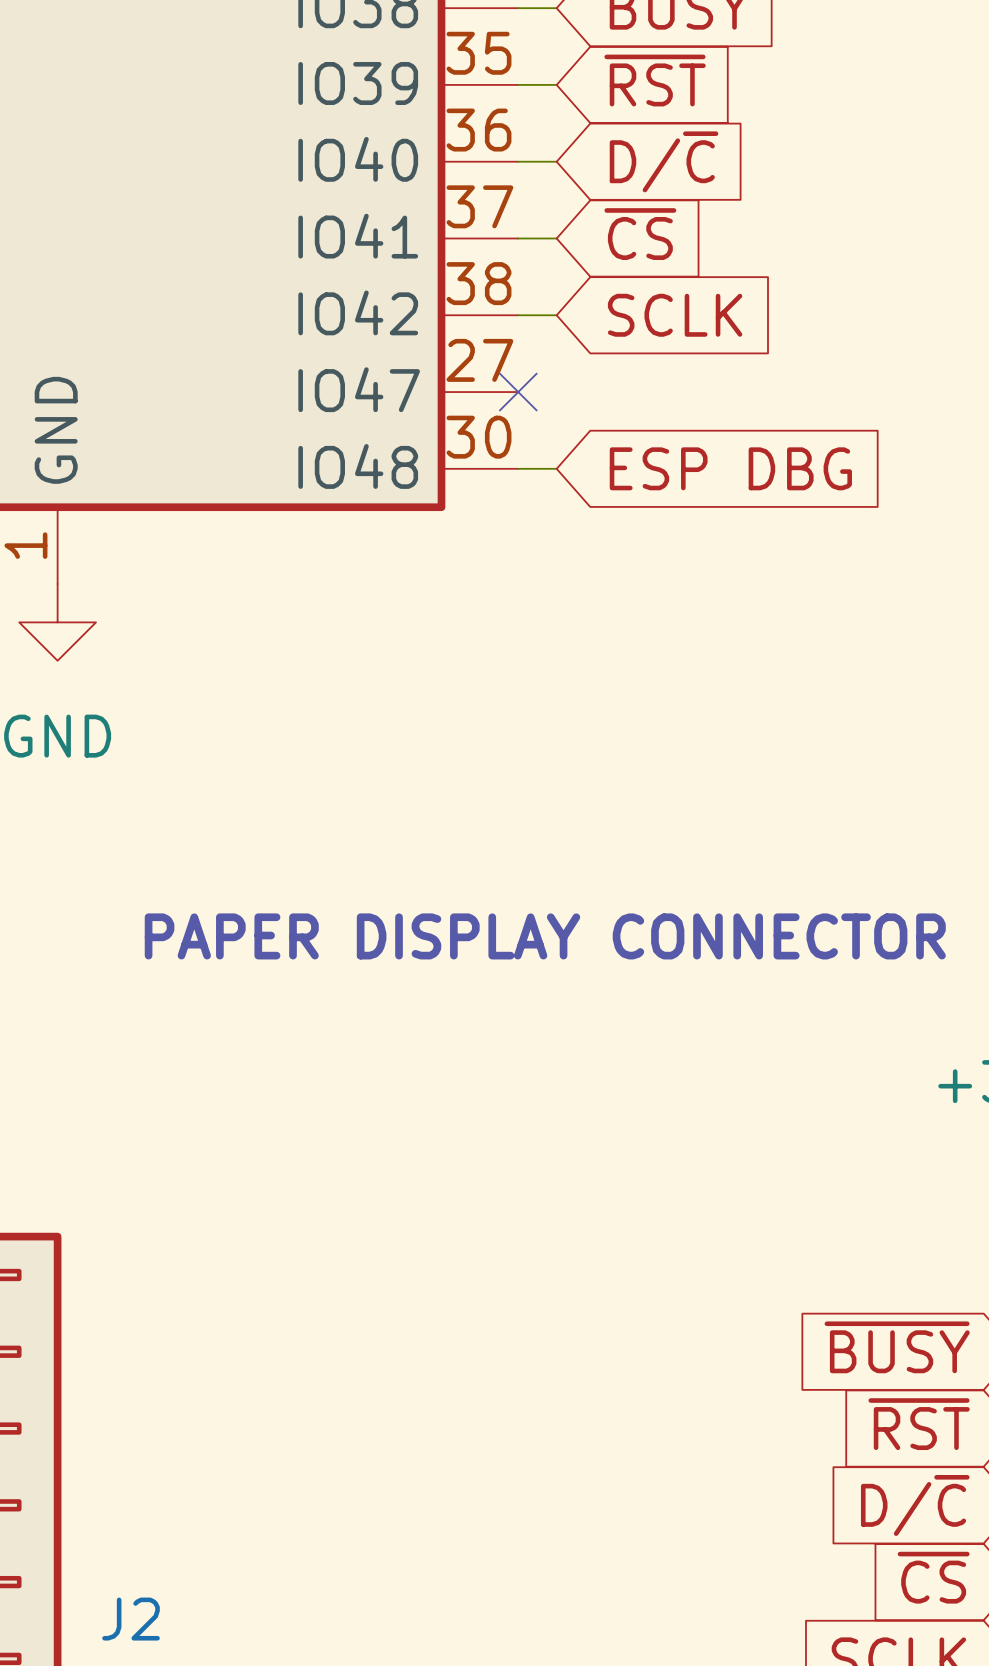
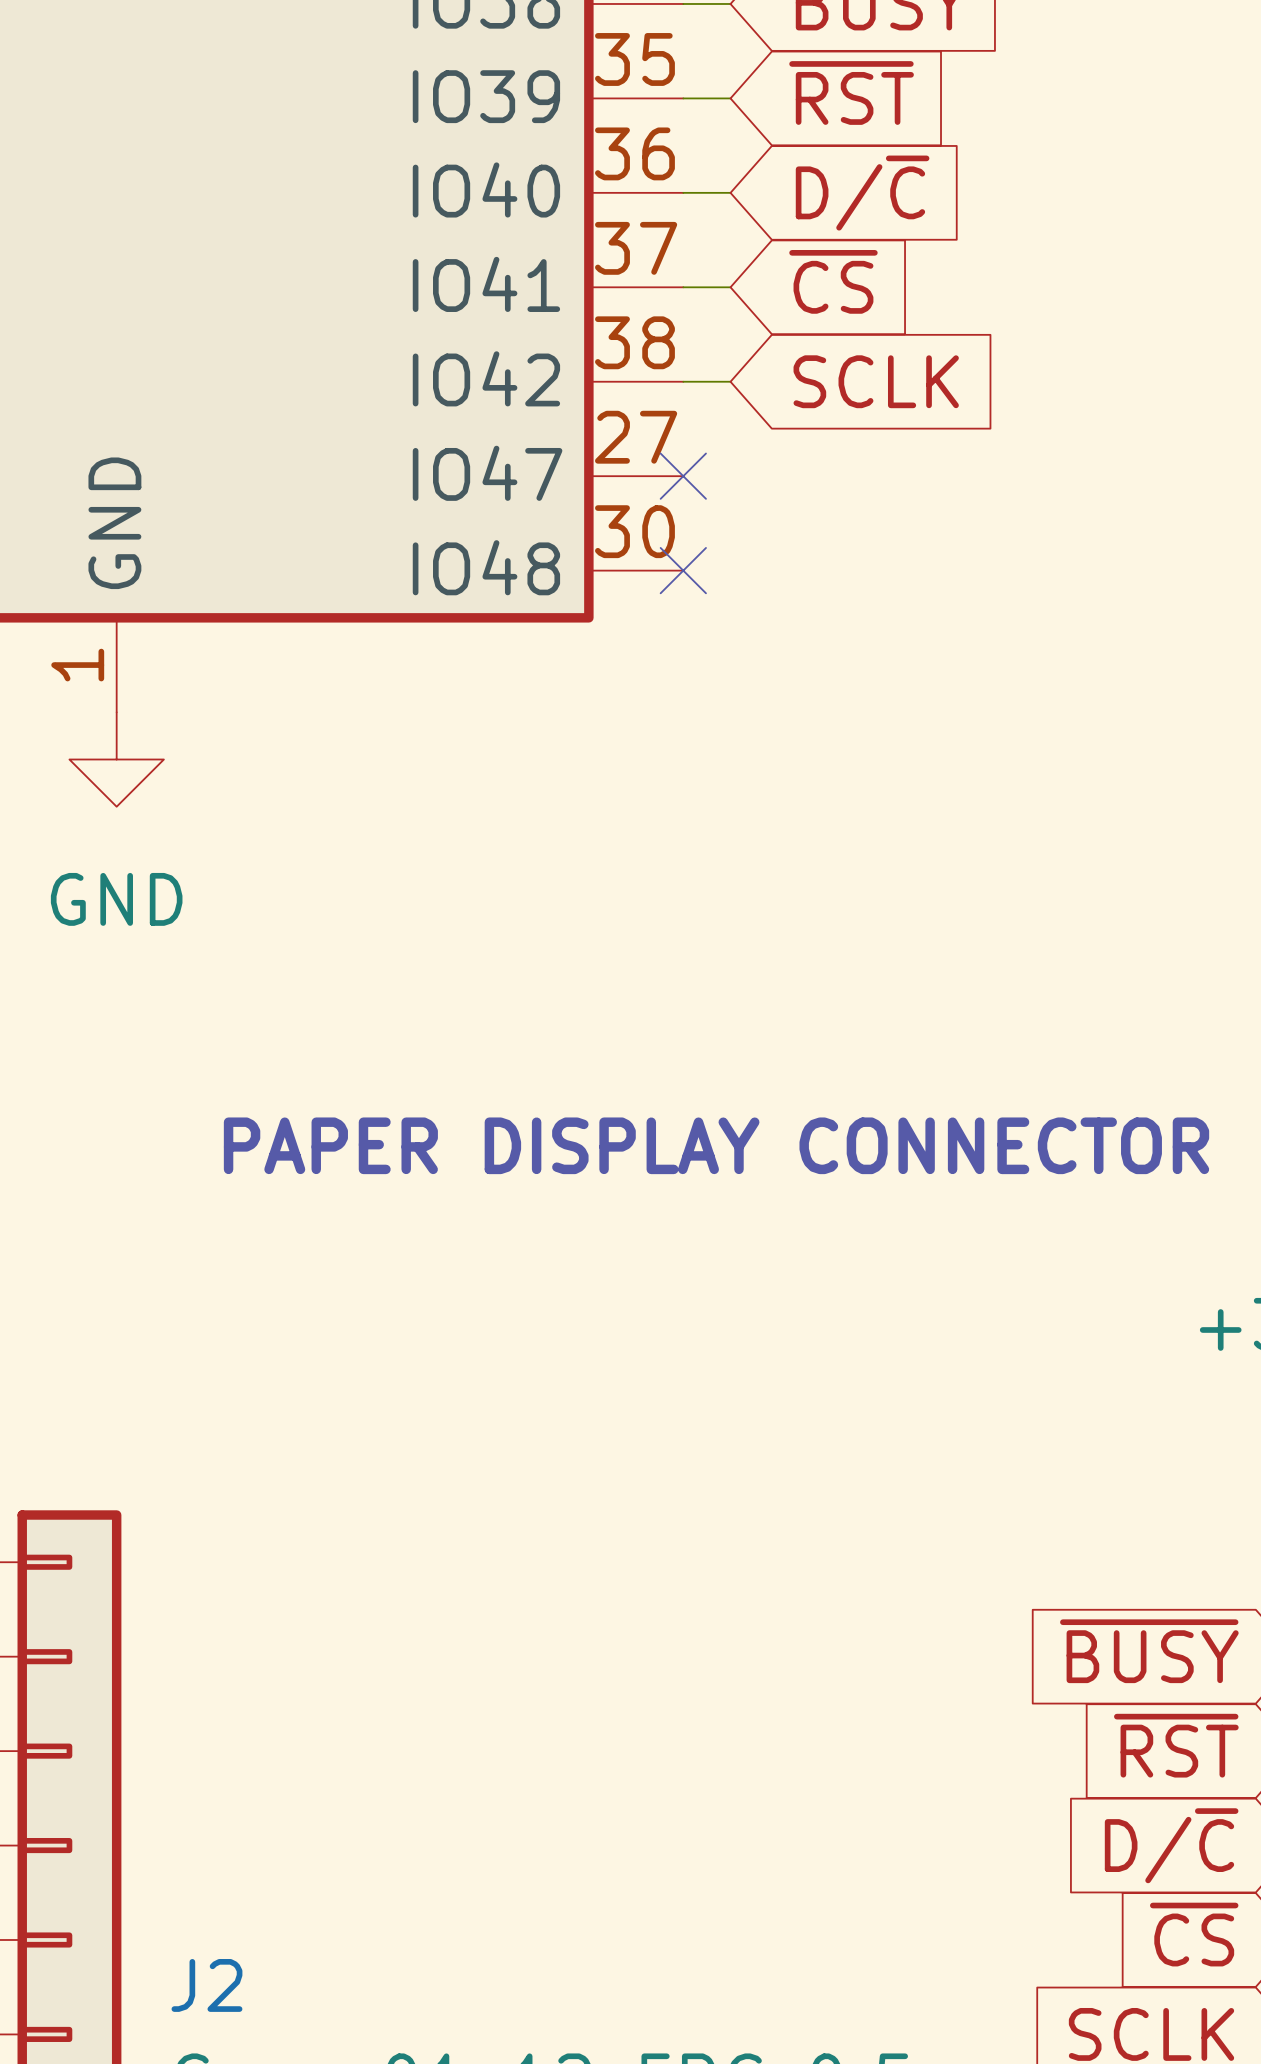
wire: (518, 468) (556, 468) -> none
no-connect mark: none -> (683, 570)
global label: ESP DBG (730, 468) -> none

